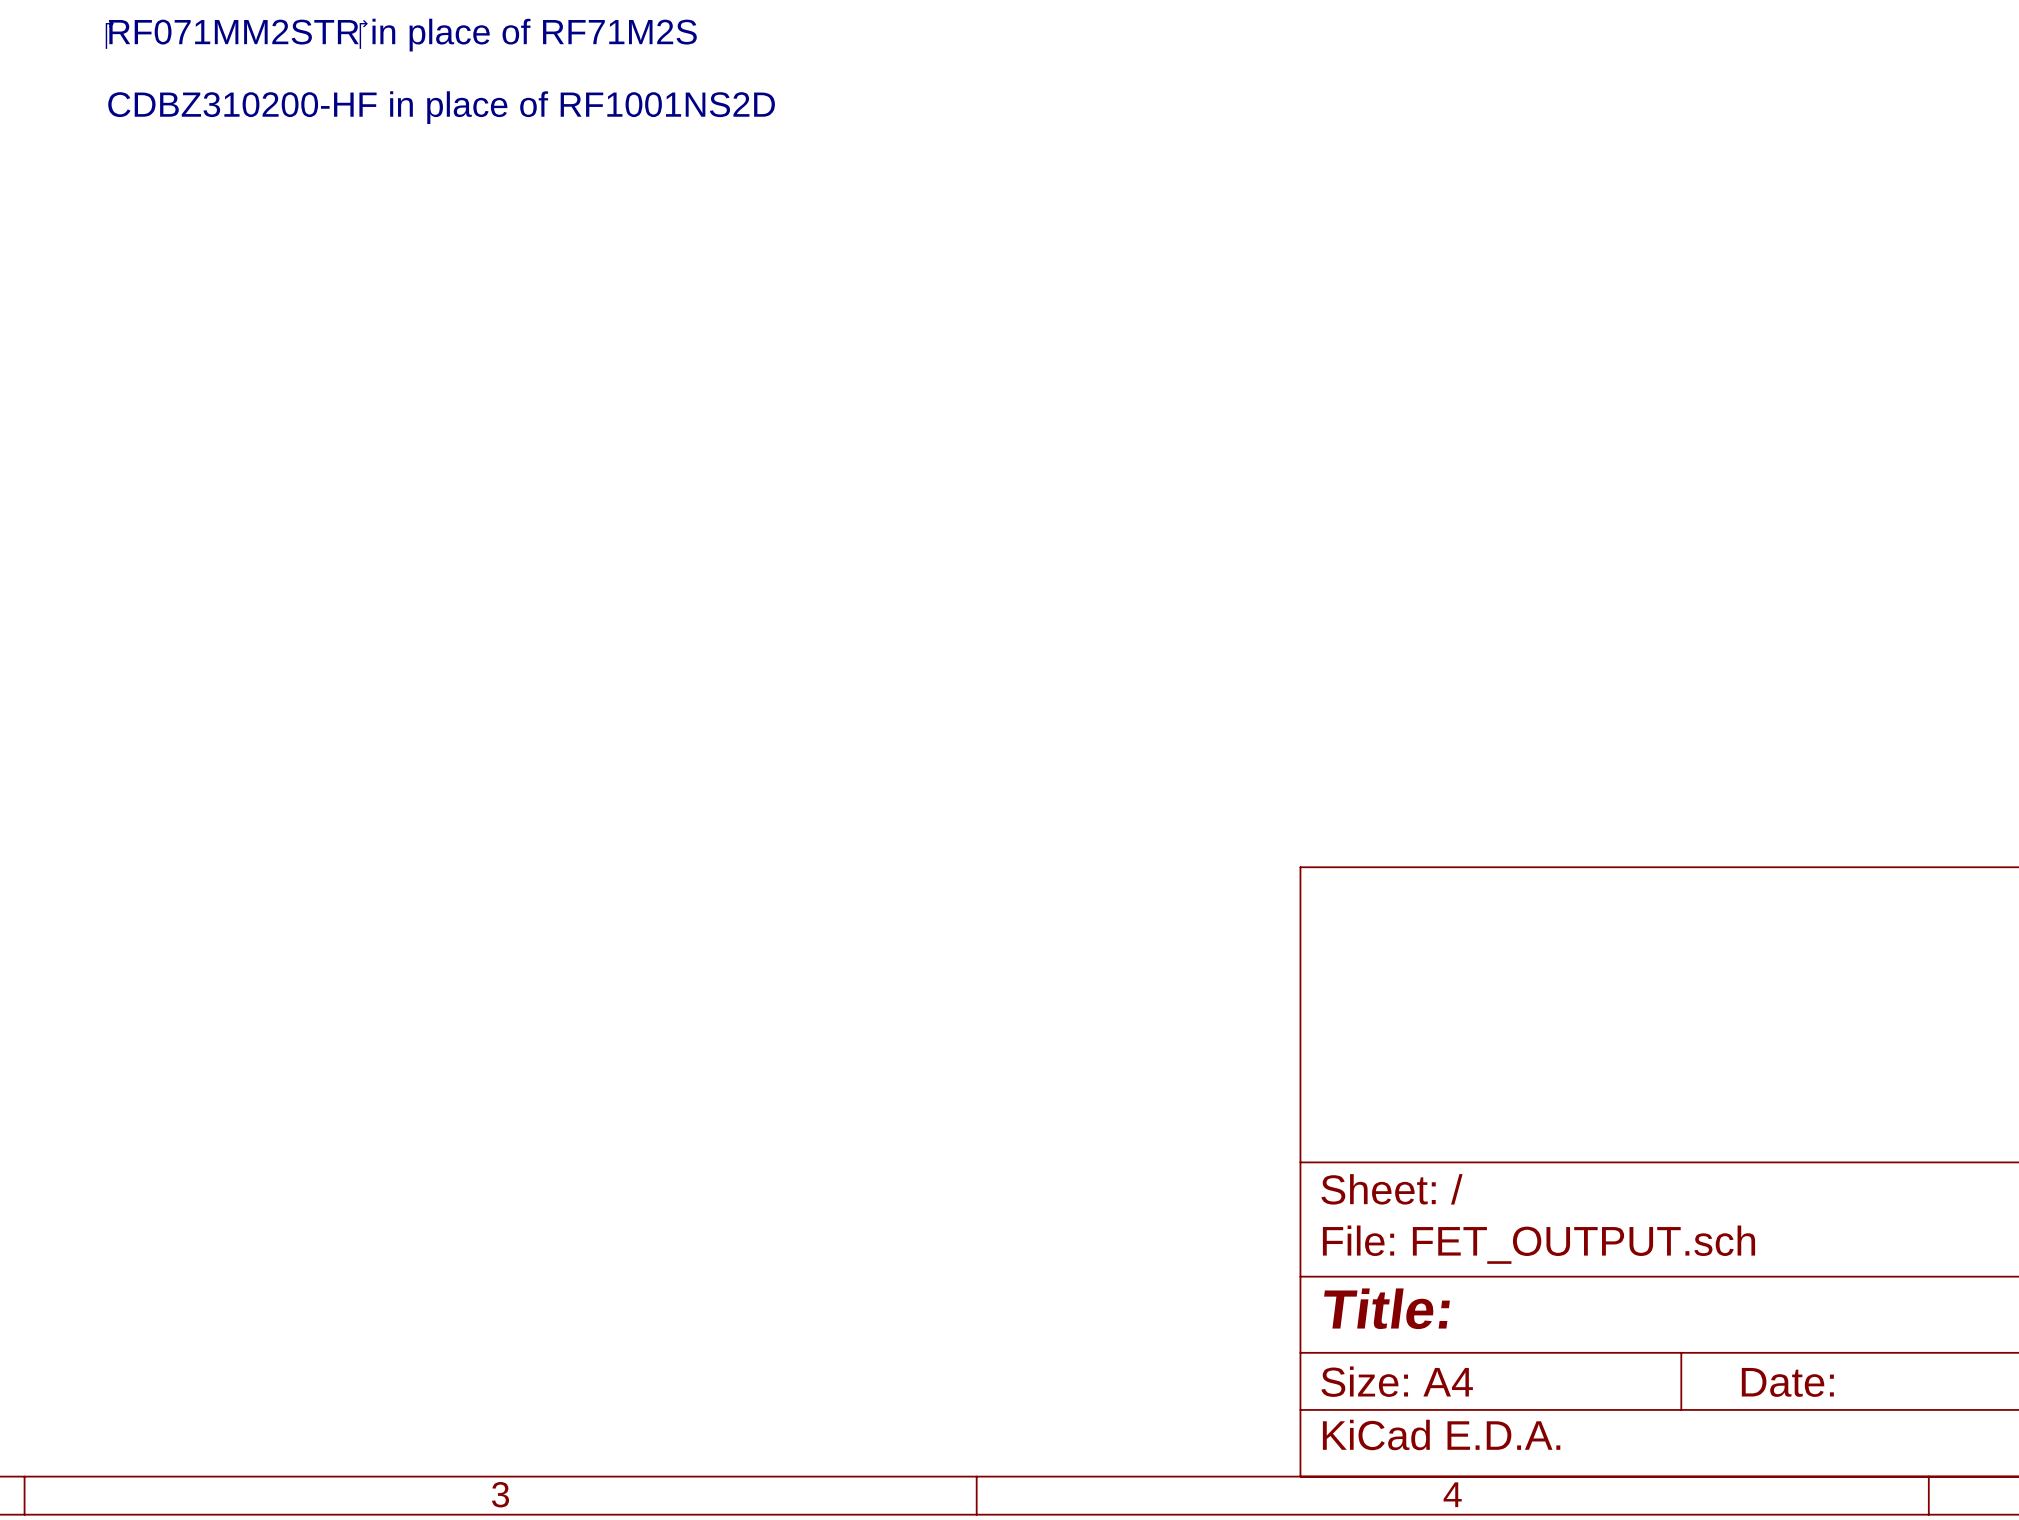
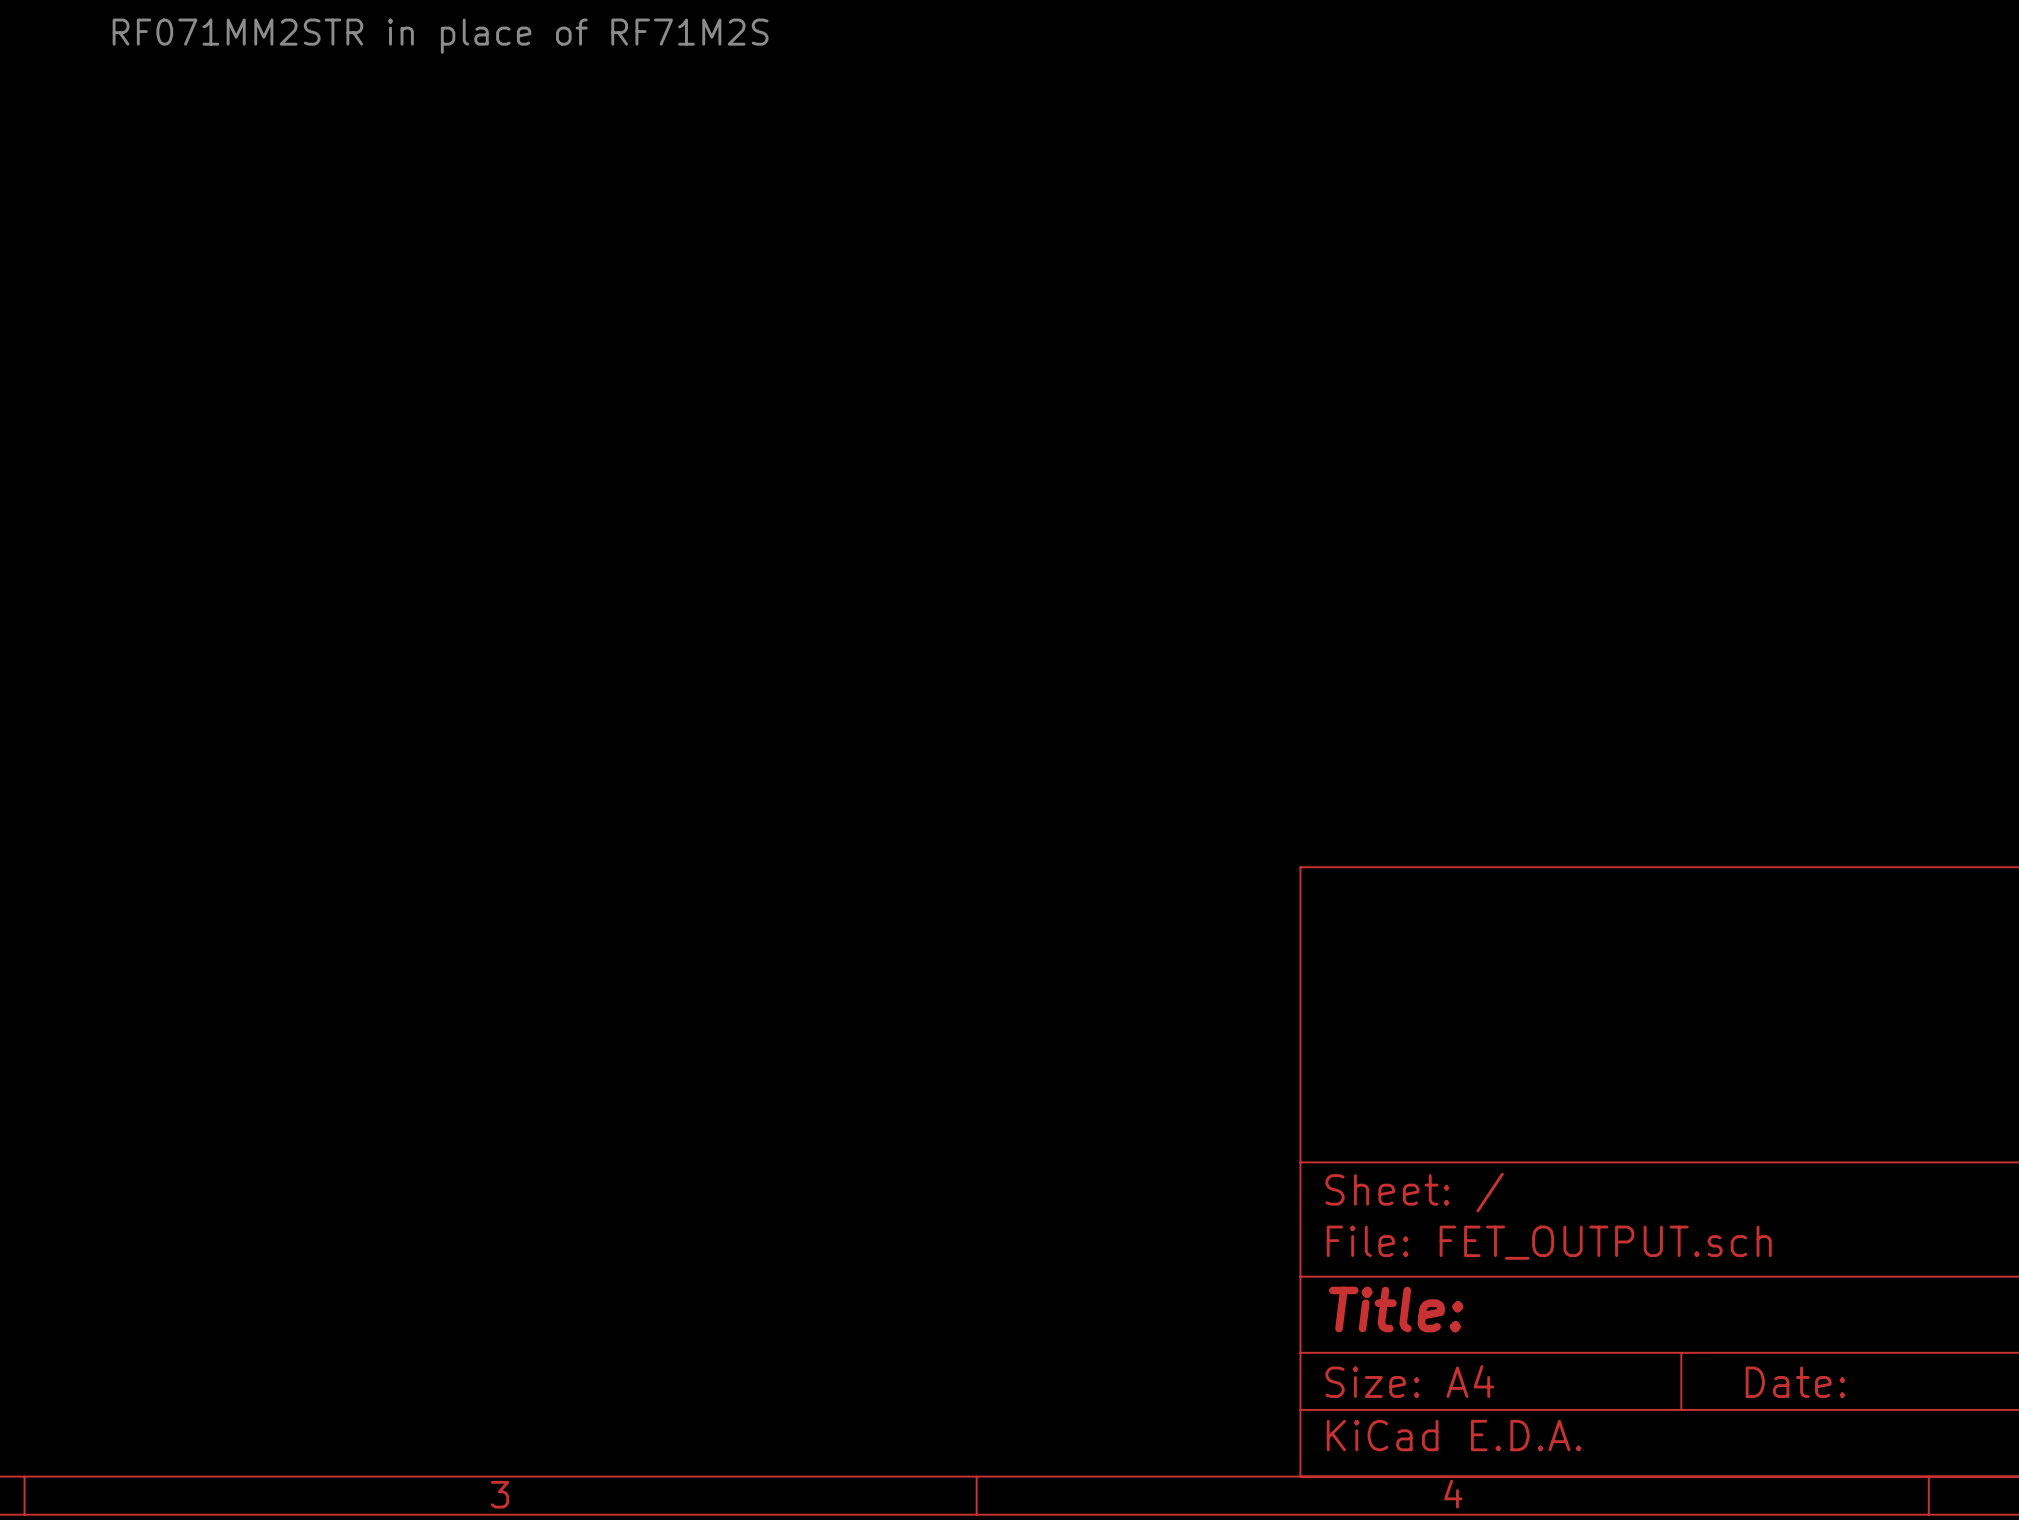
text: CDBZ310200-HF in place of RF1001NS2D (441, 107) -> none

